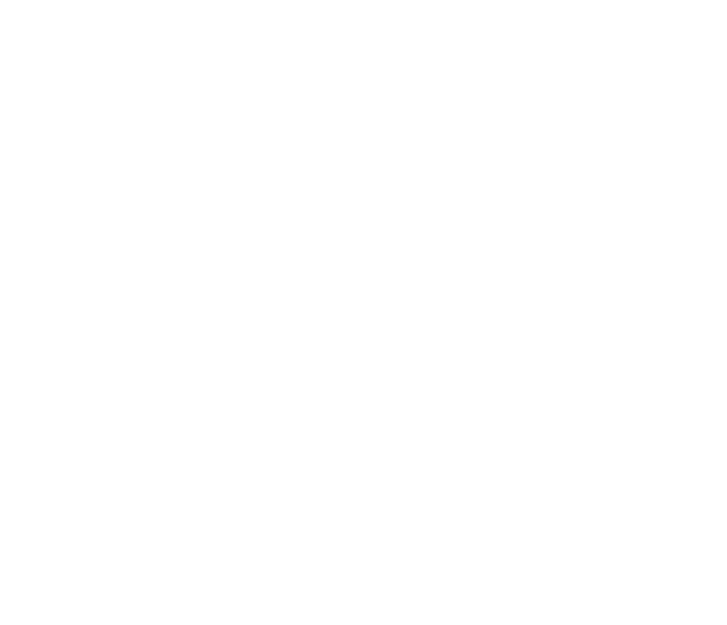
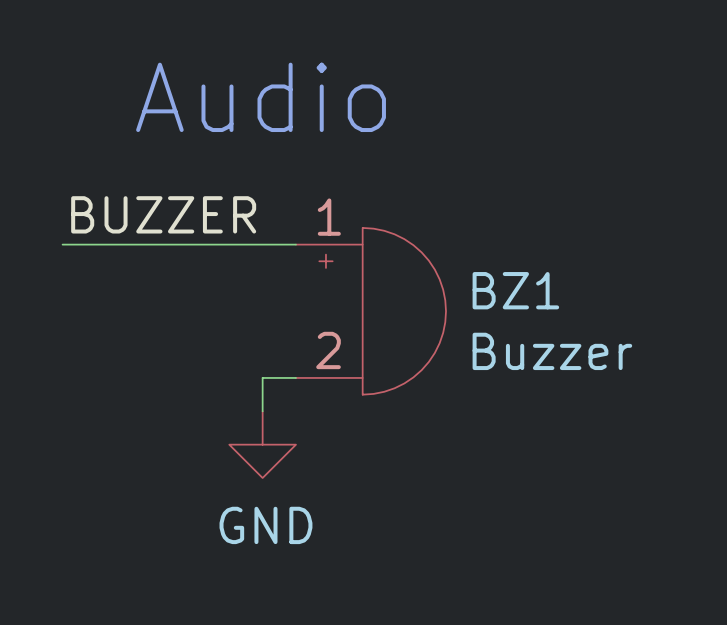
text: none -> Audio (261, 97)
label: none -> BUZZER (163, 214)
wire: none -> (62, 244) (295, 244)
BZ1: none -> Buzzer (370, 311)
wire: none -> (295, 377) (262, 377) (262, 411)
power symbol: none -> GND (262, 444)

